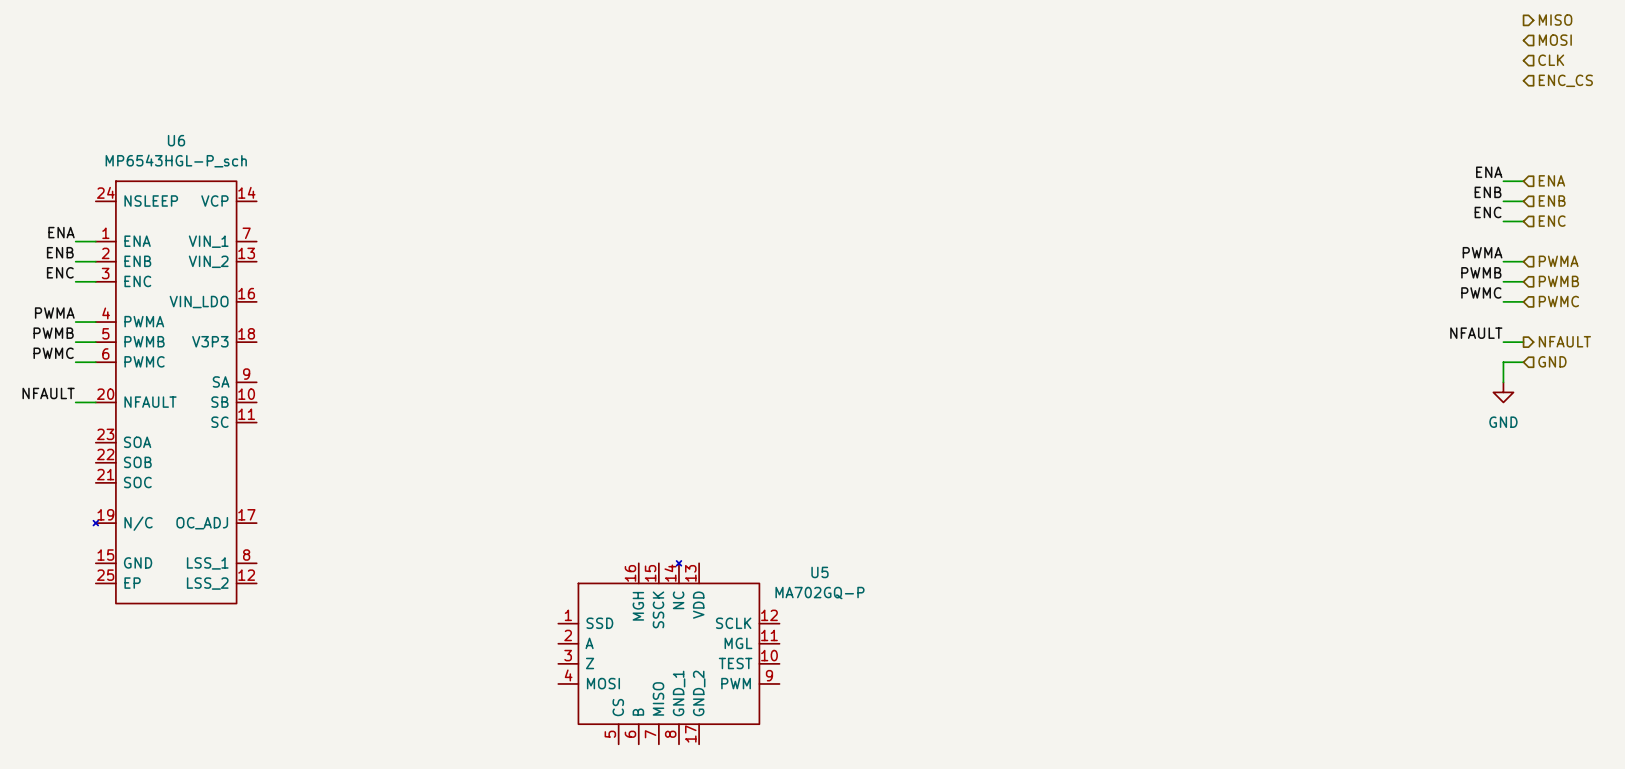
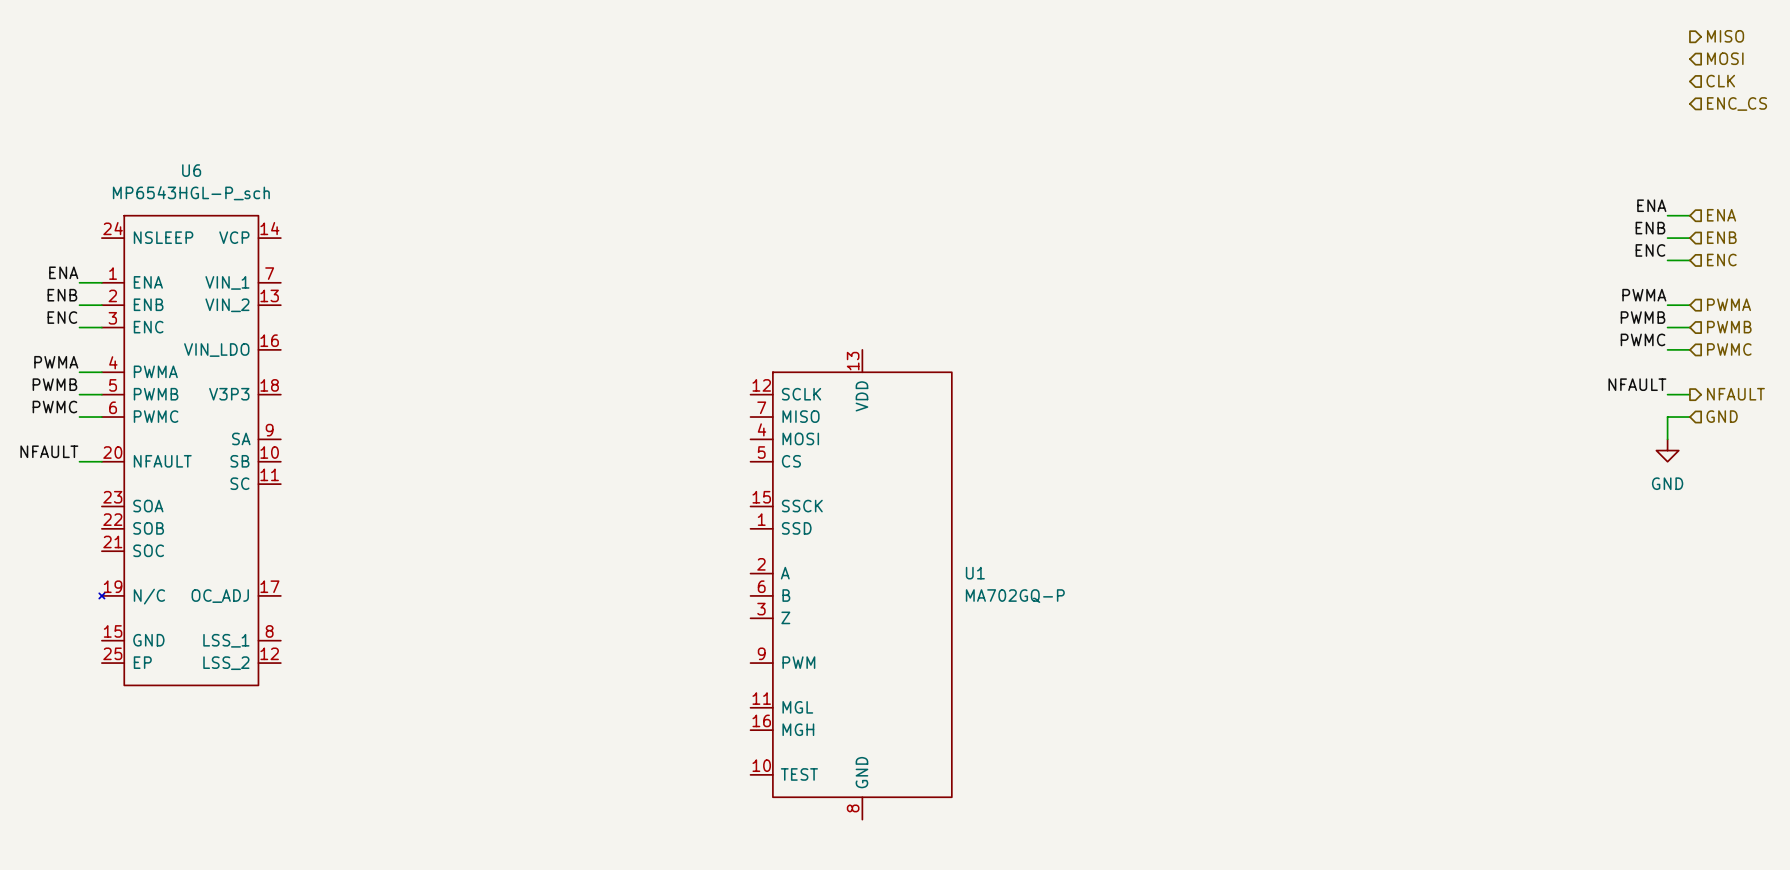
U1: none -> MA702GQ-P (851, 584)
U5: MA702GQ-P (668, 652) -> none

